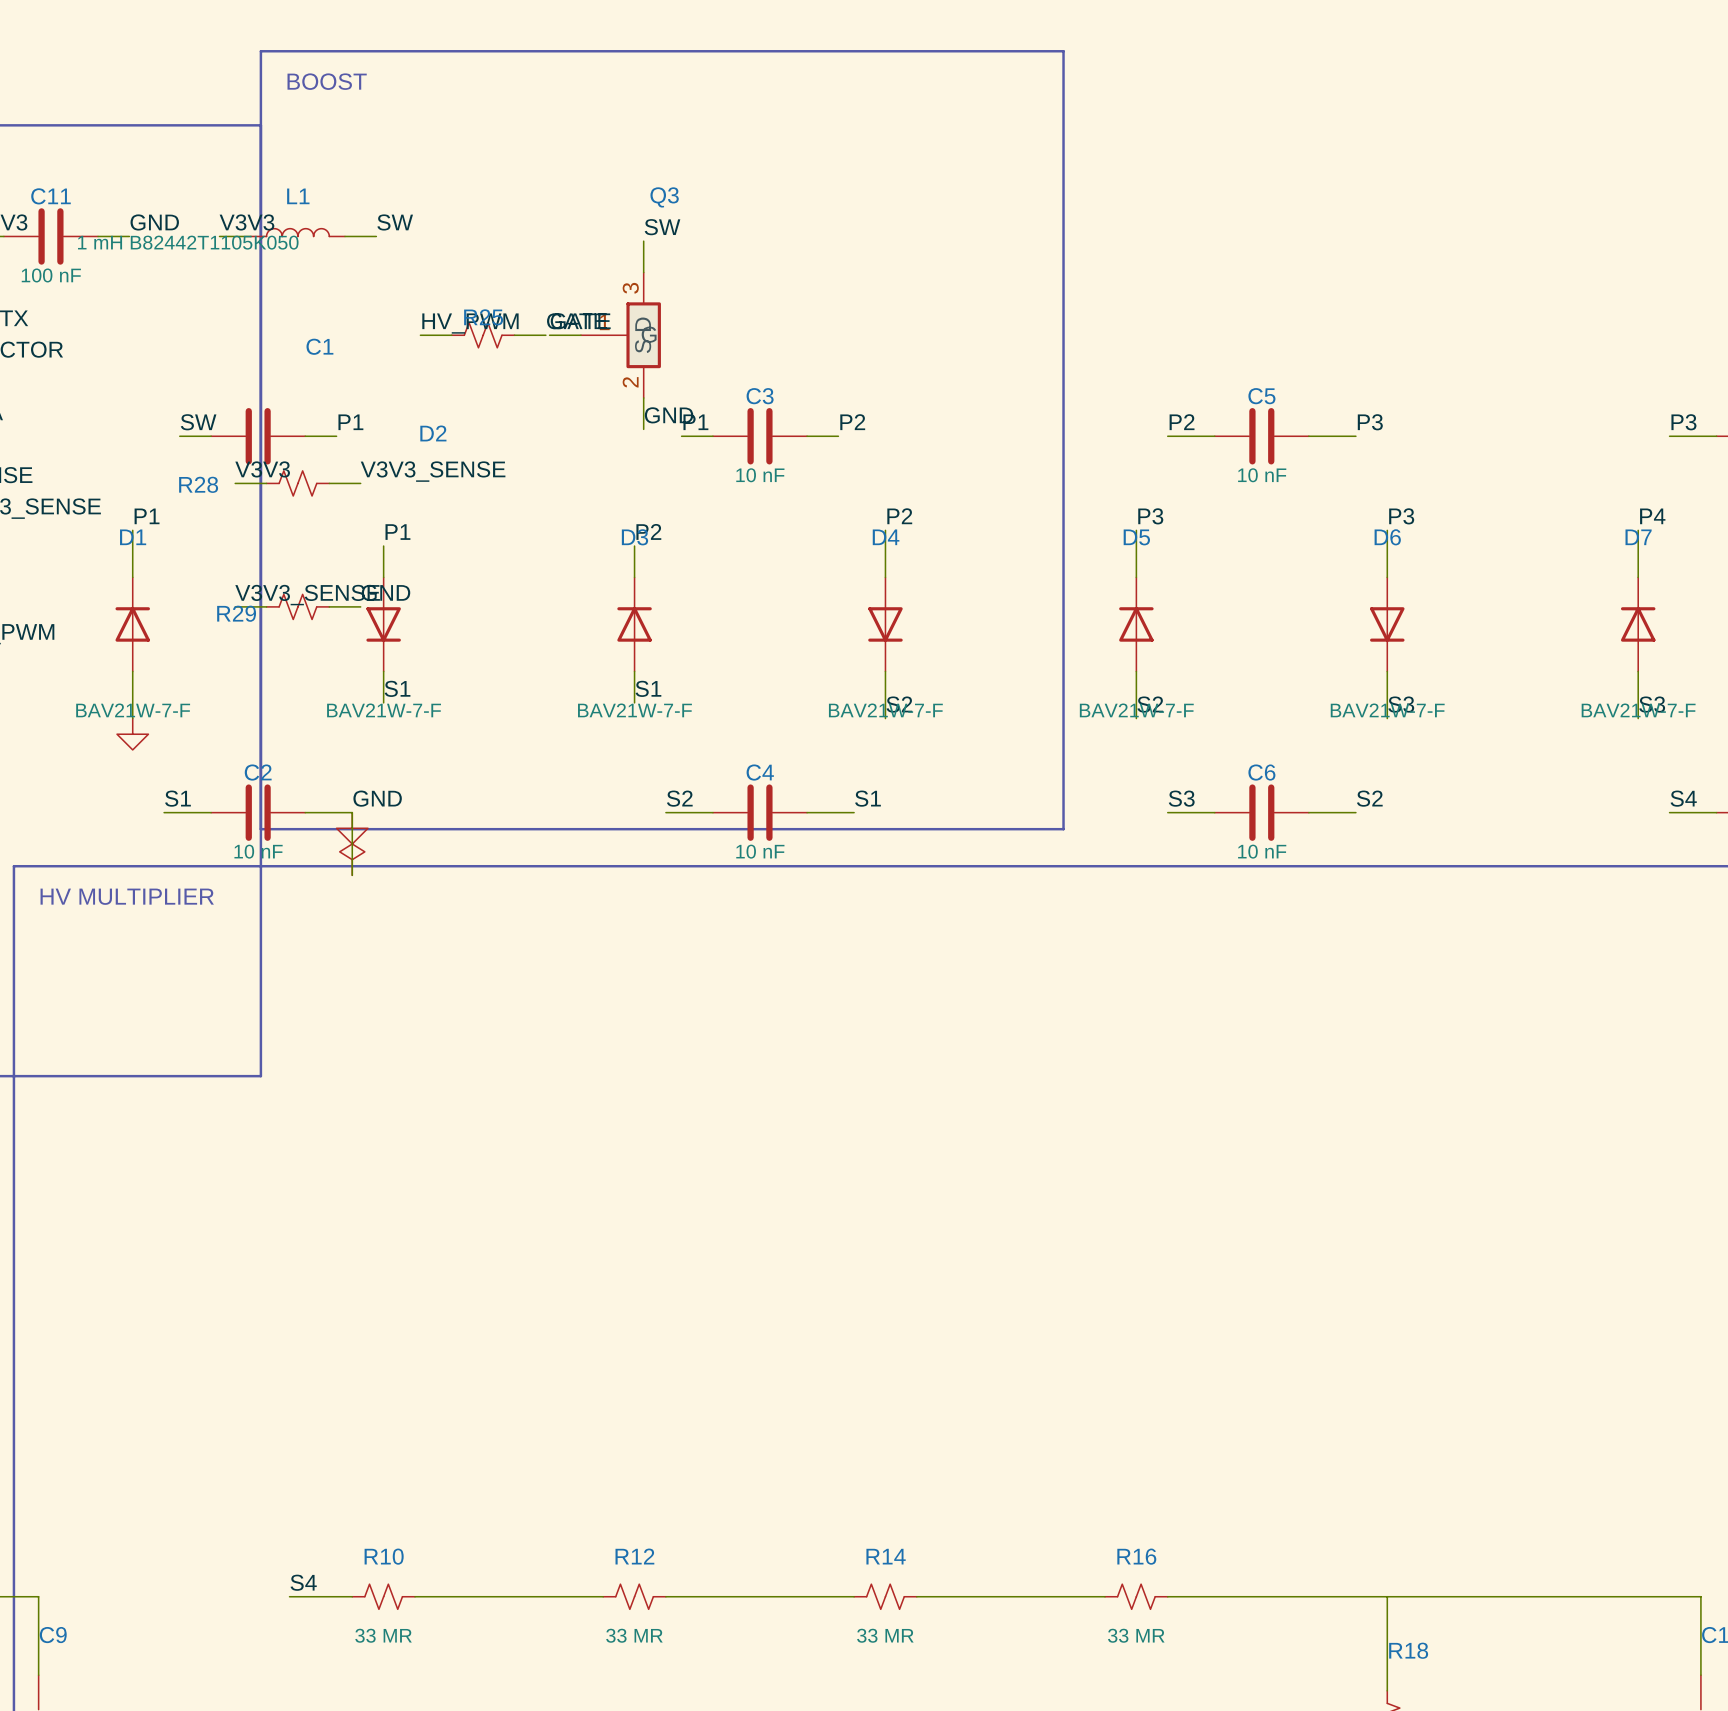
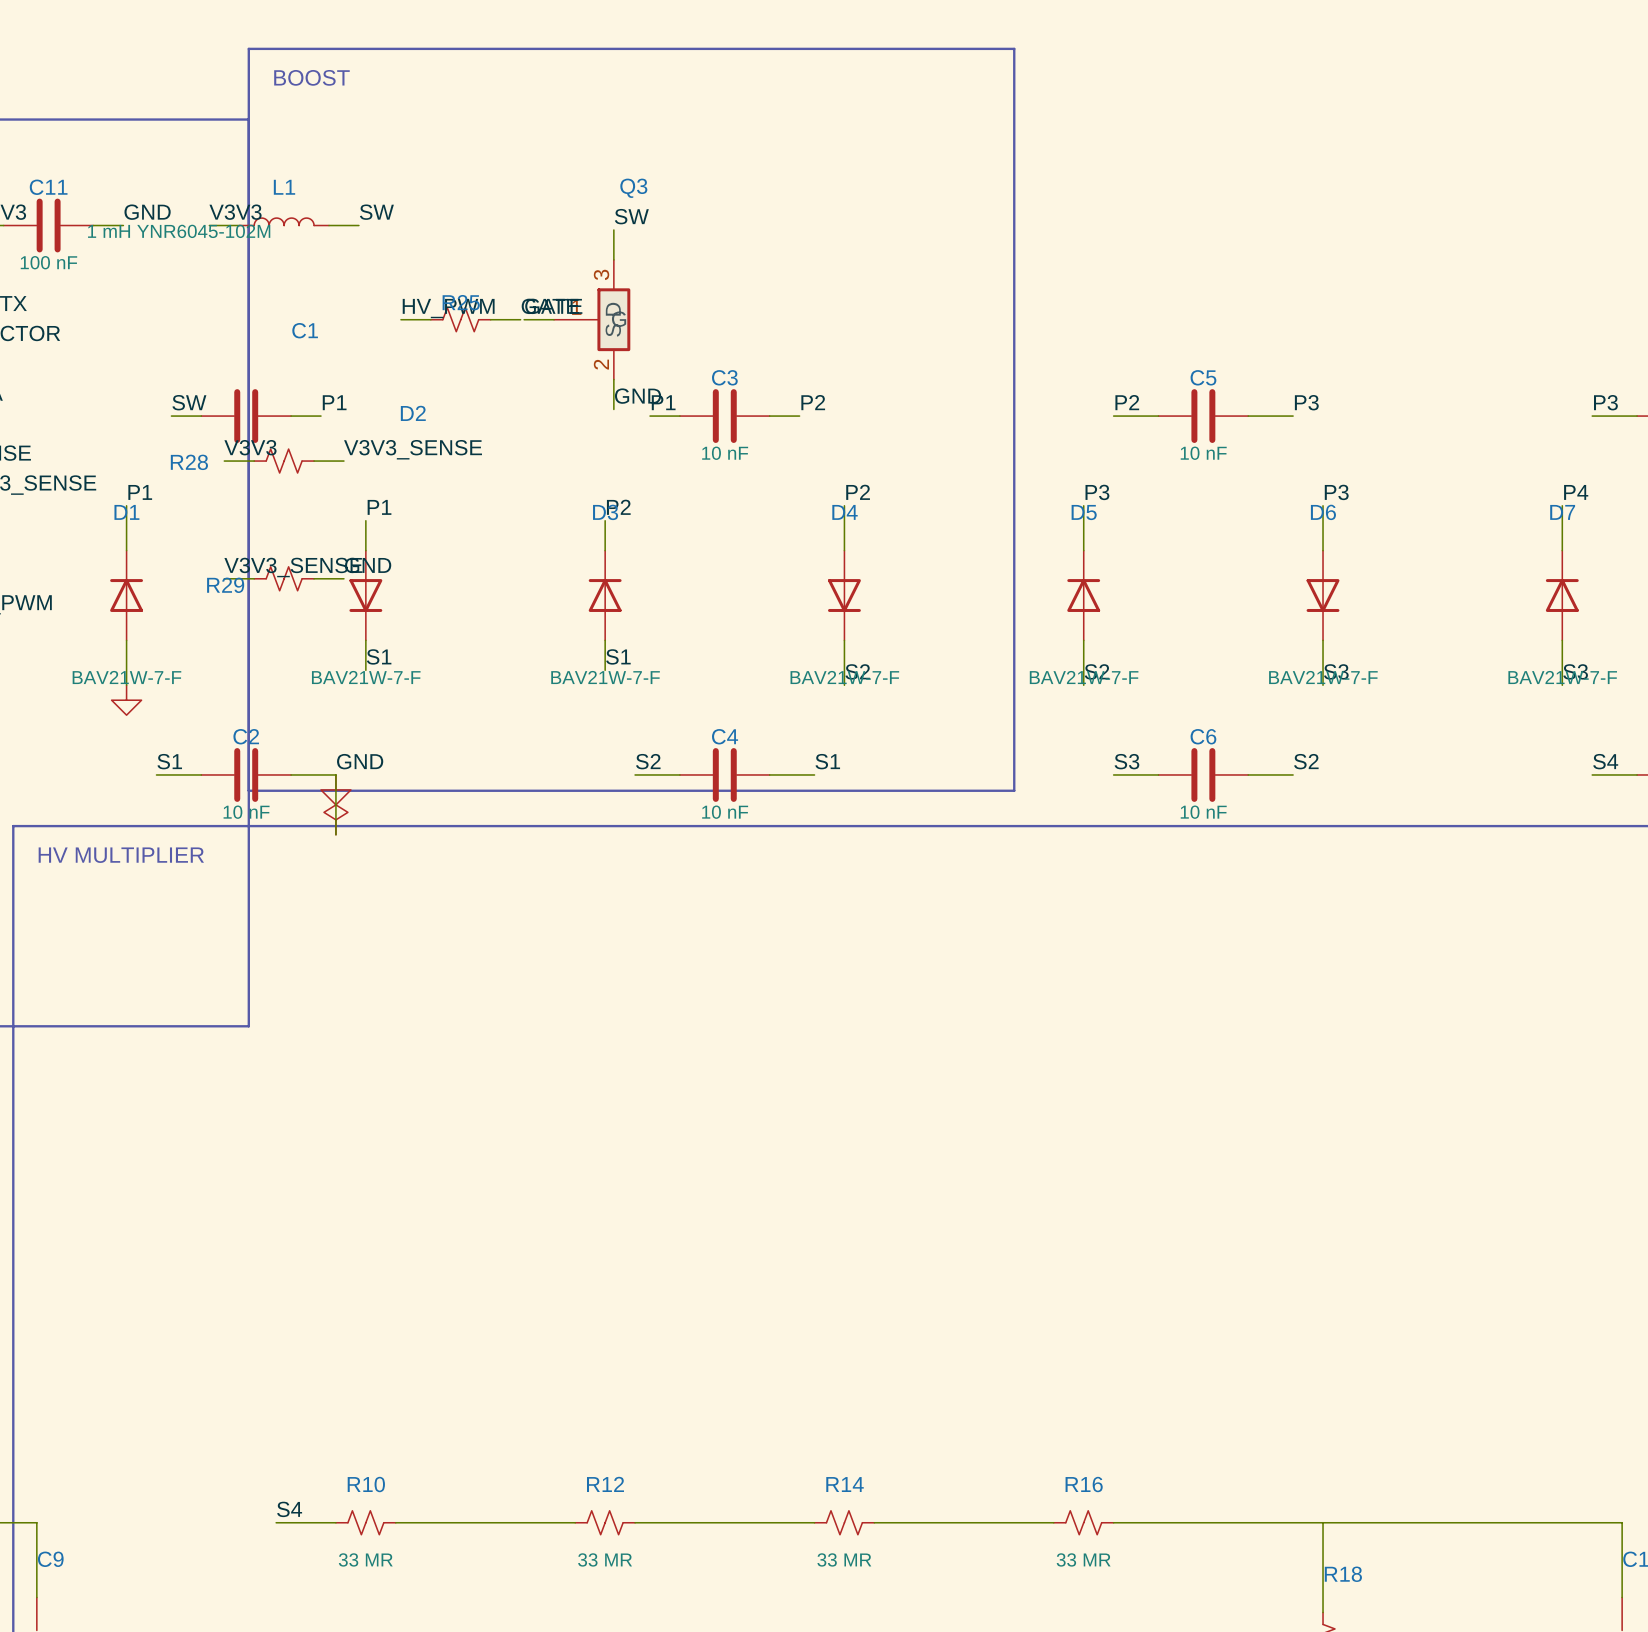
L1 value: 1 mH B82442T1105K050 (188, 242) -> 1 mH YNR6045-102M (179, 231)

